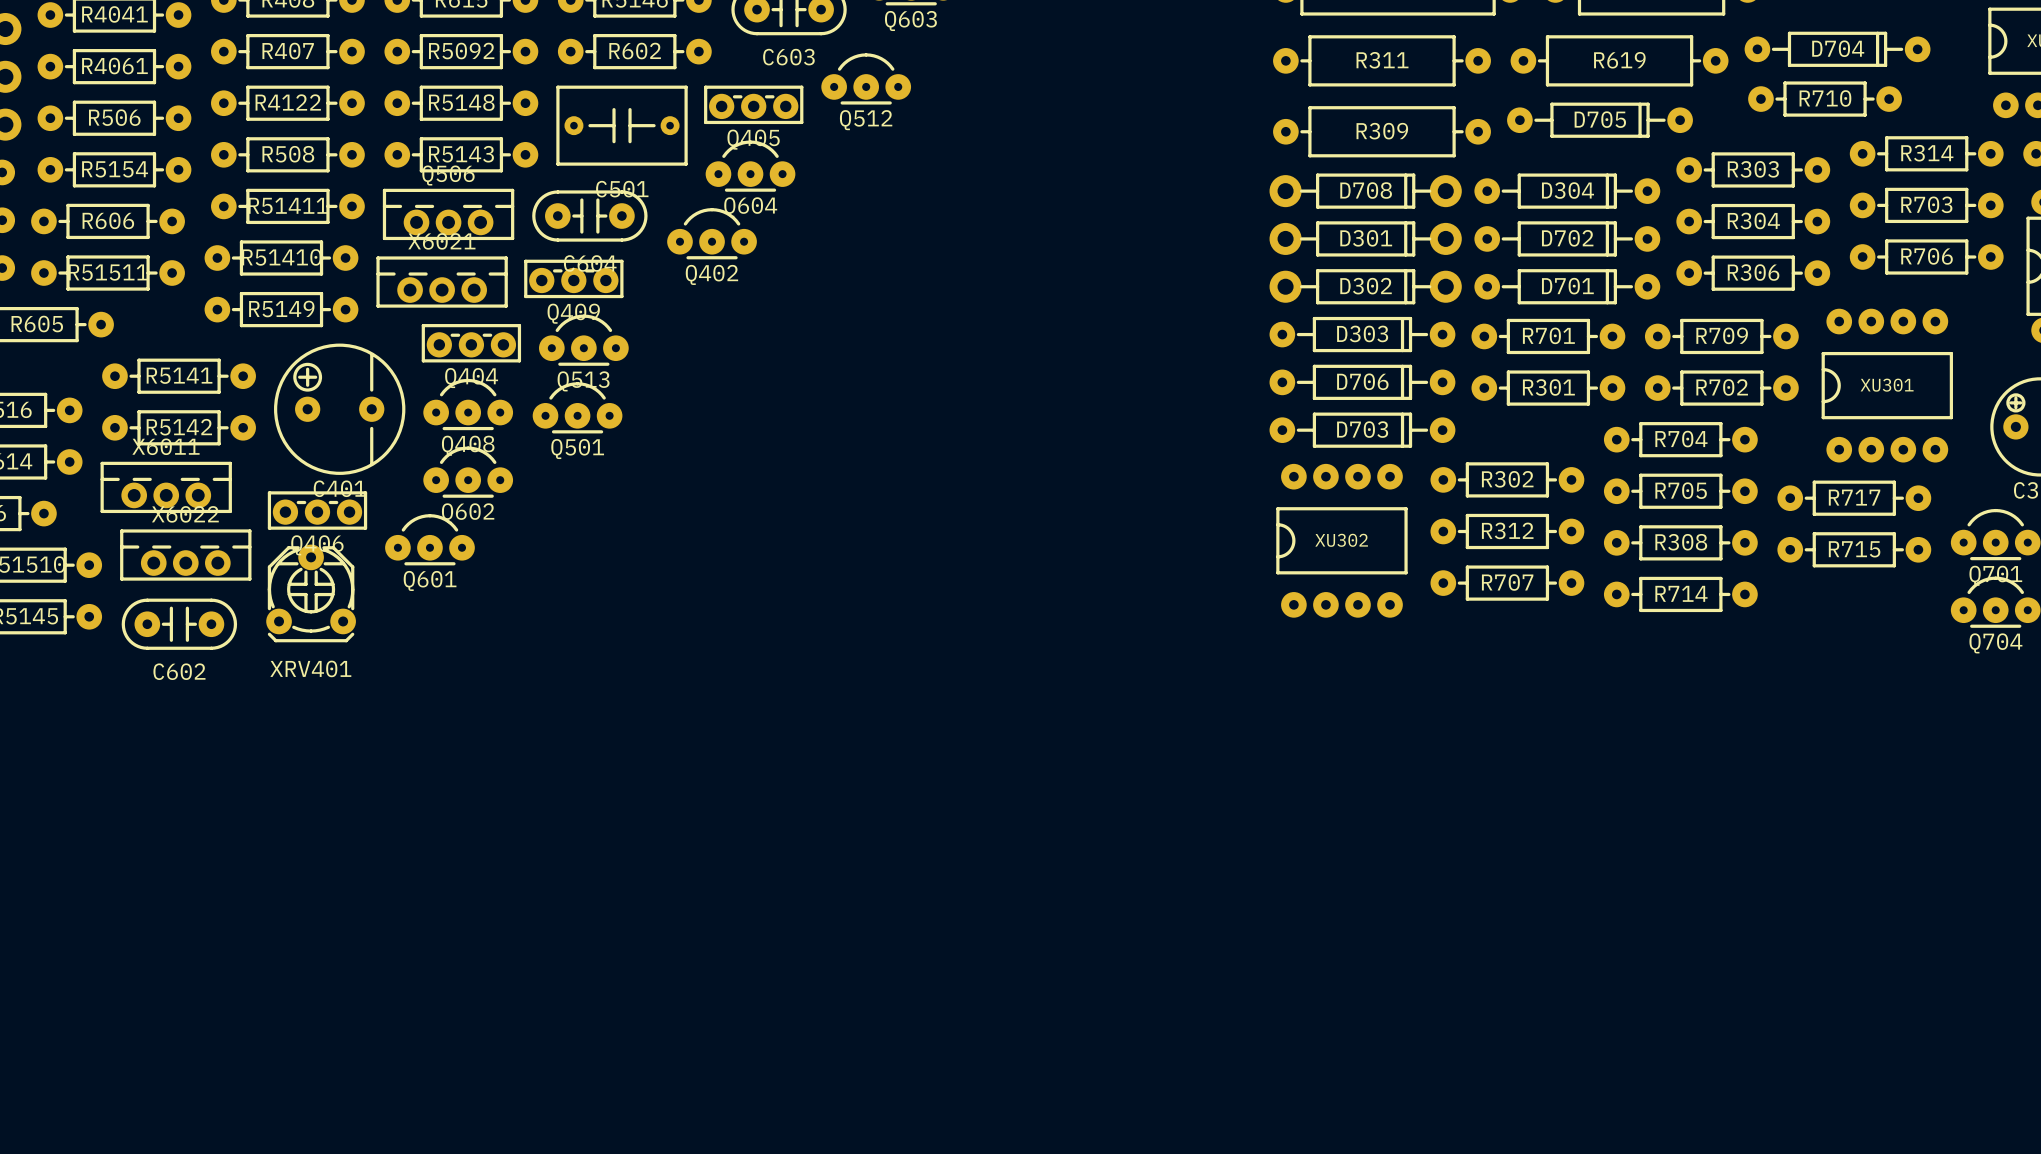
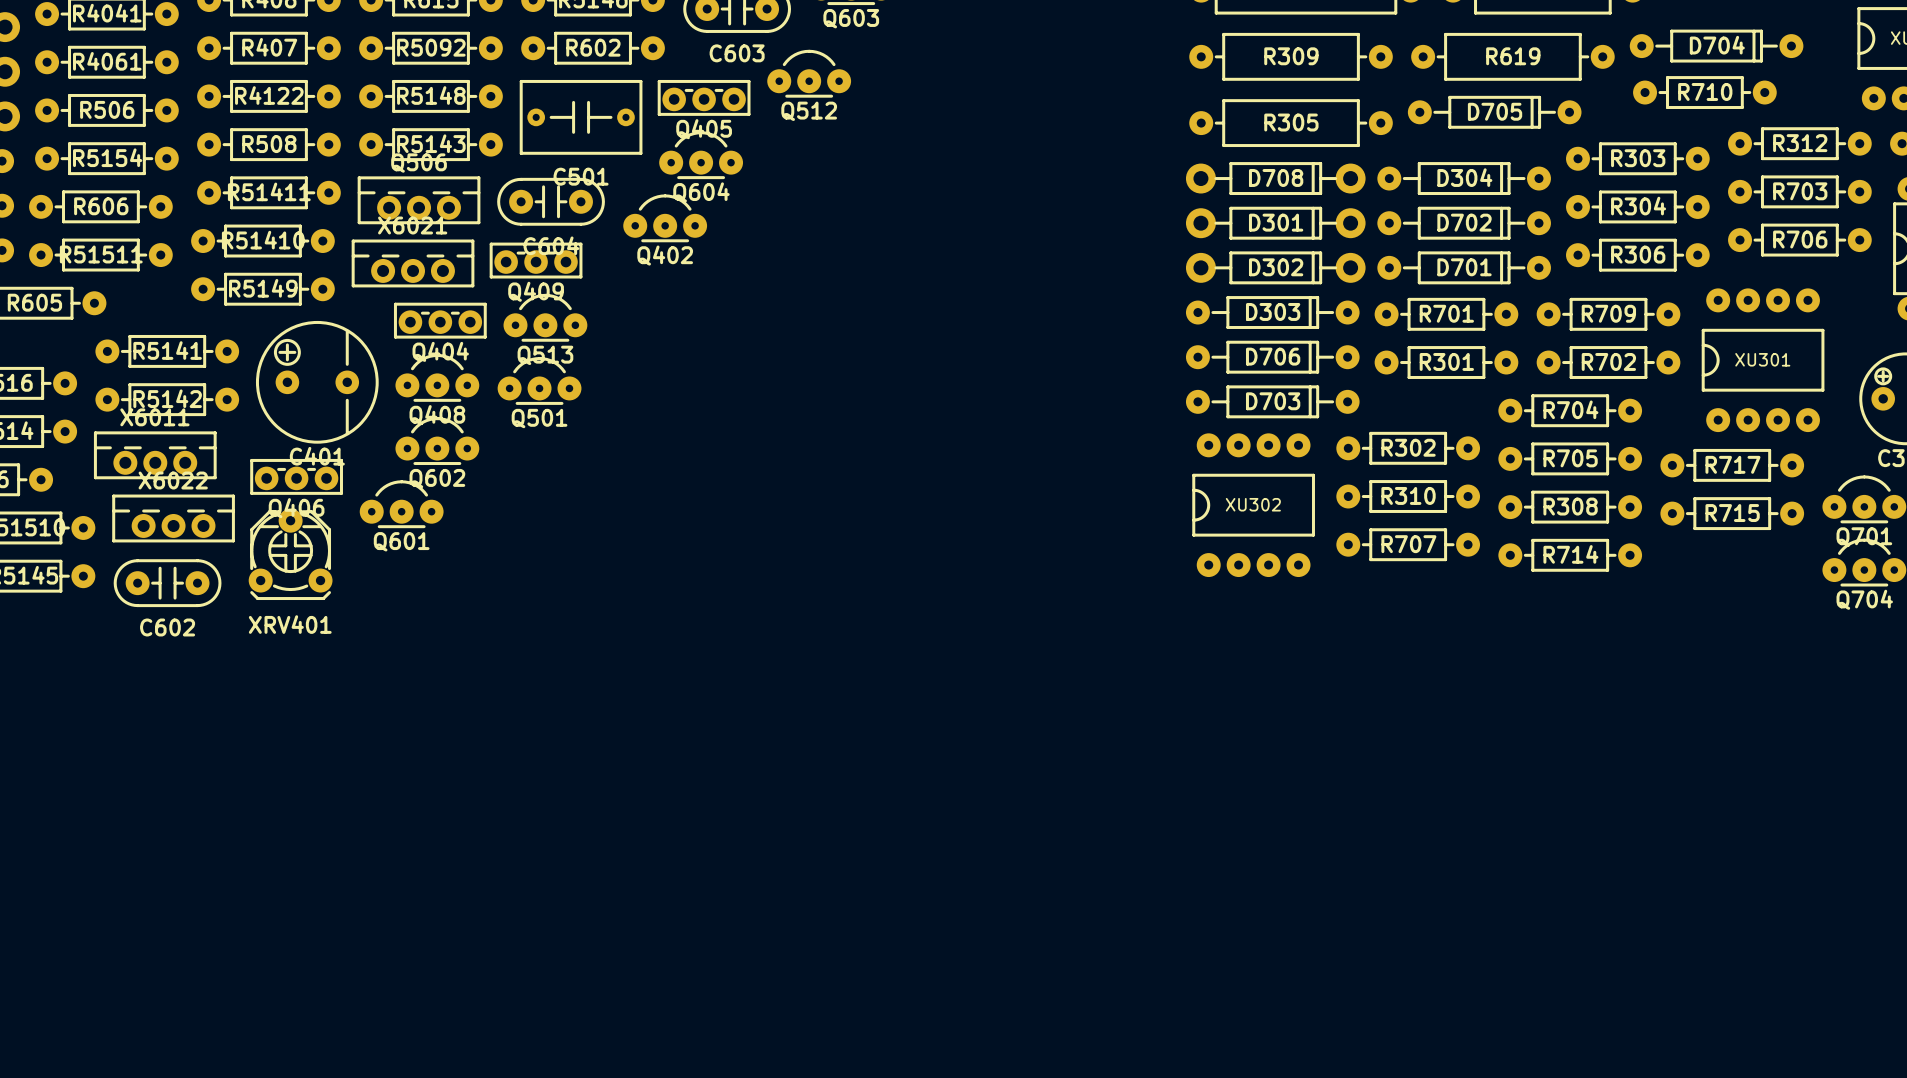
R311 name: R311 (1382, 60) -> R309 (1291, 56)
R309 name: R309 (1382, 131) -> R305 (1291, 122)
R314 name: R314 (1927, 153) -> R312 (1800, 143)
R312 name: R312 (1507, 530) -> R310 (1408, 495)

